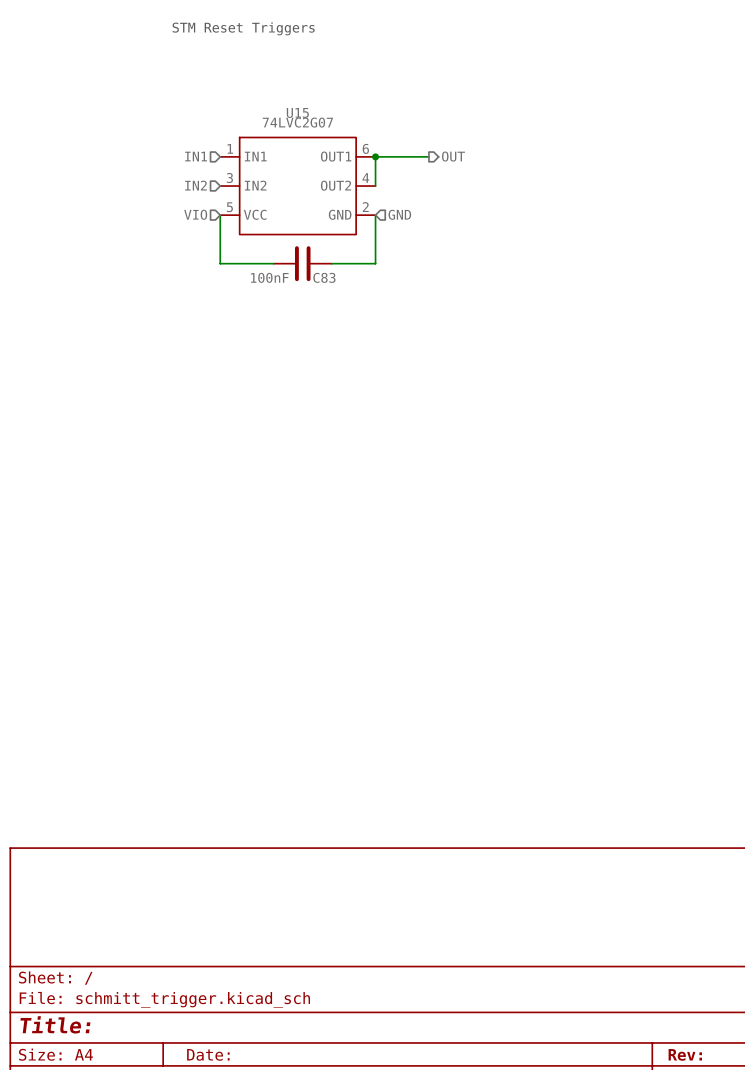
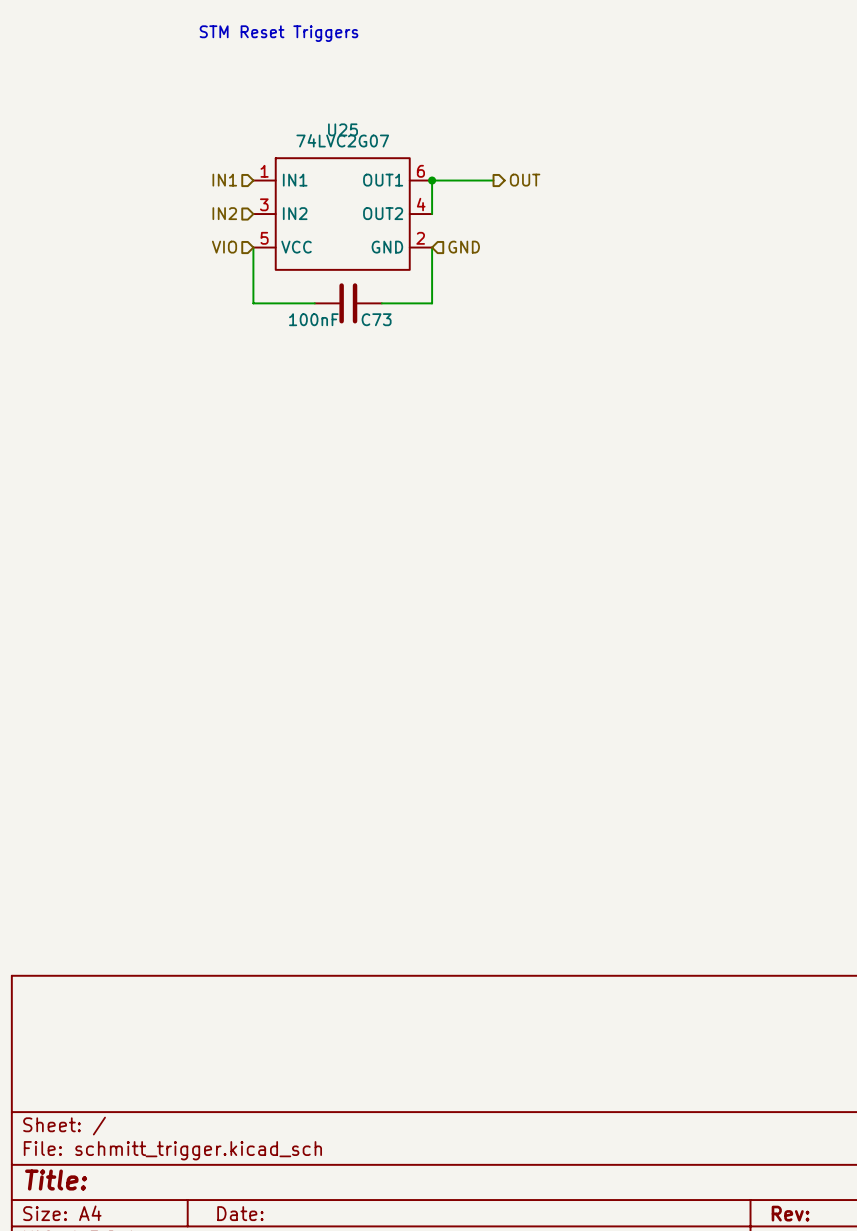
U15 name: U15 (297, 112) -> U25 (343, 129)
C83 name: C83 (324, 277) -> C73 (376, 319)

